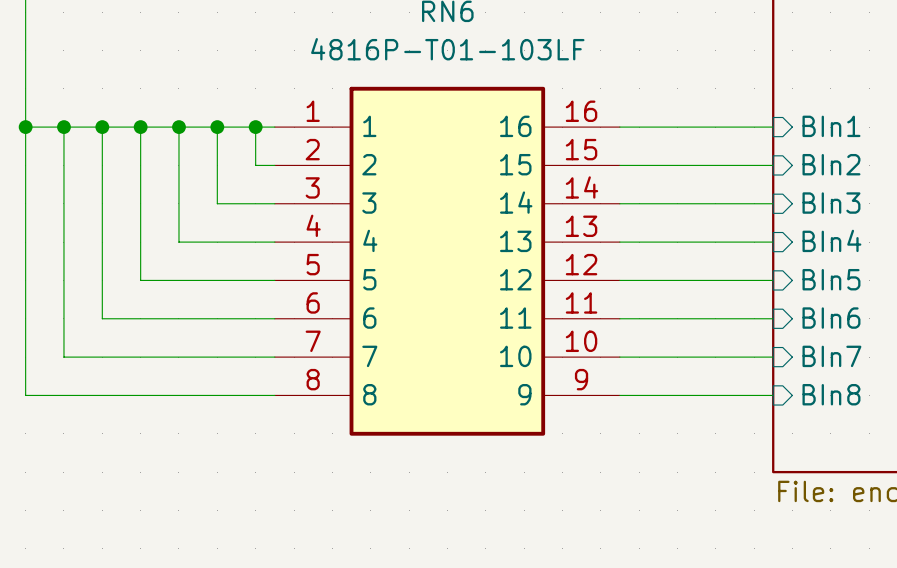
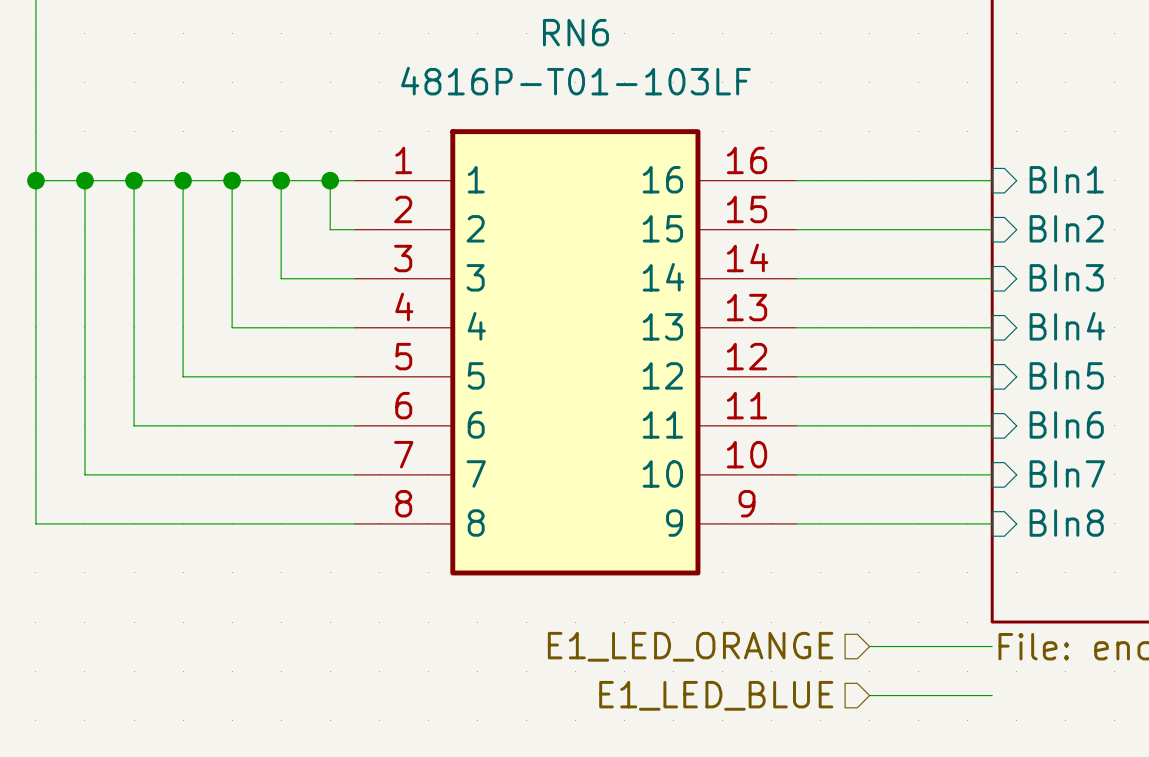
hierarchical label: none -> E1_LED_ORANGE (690, 646)
wire: none -> (869, 646) (992, 646)
hierarchical label: none -> E1_LED_BLUE (716, 695)
wire: none -> (869, 695) (992, 695)

